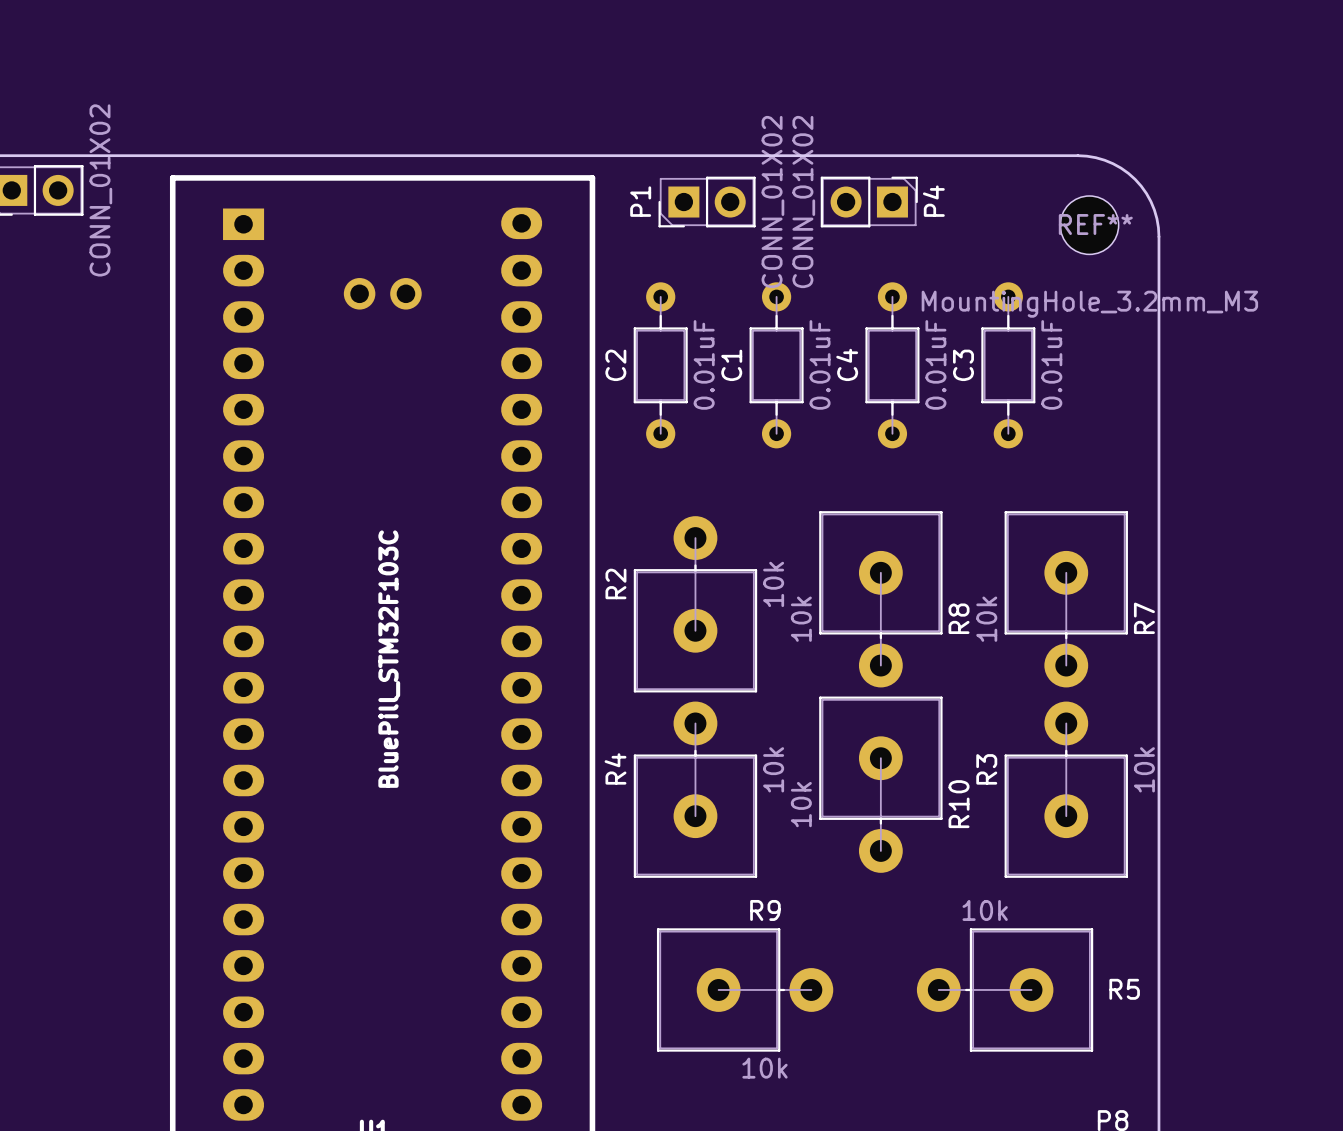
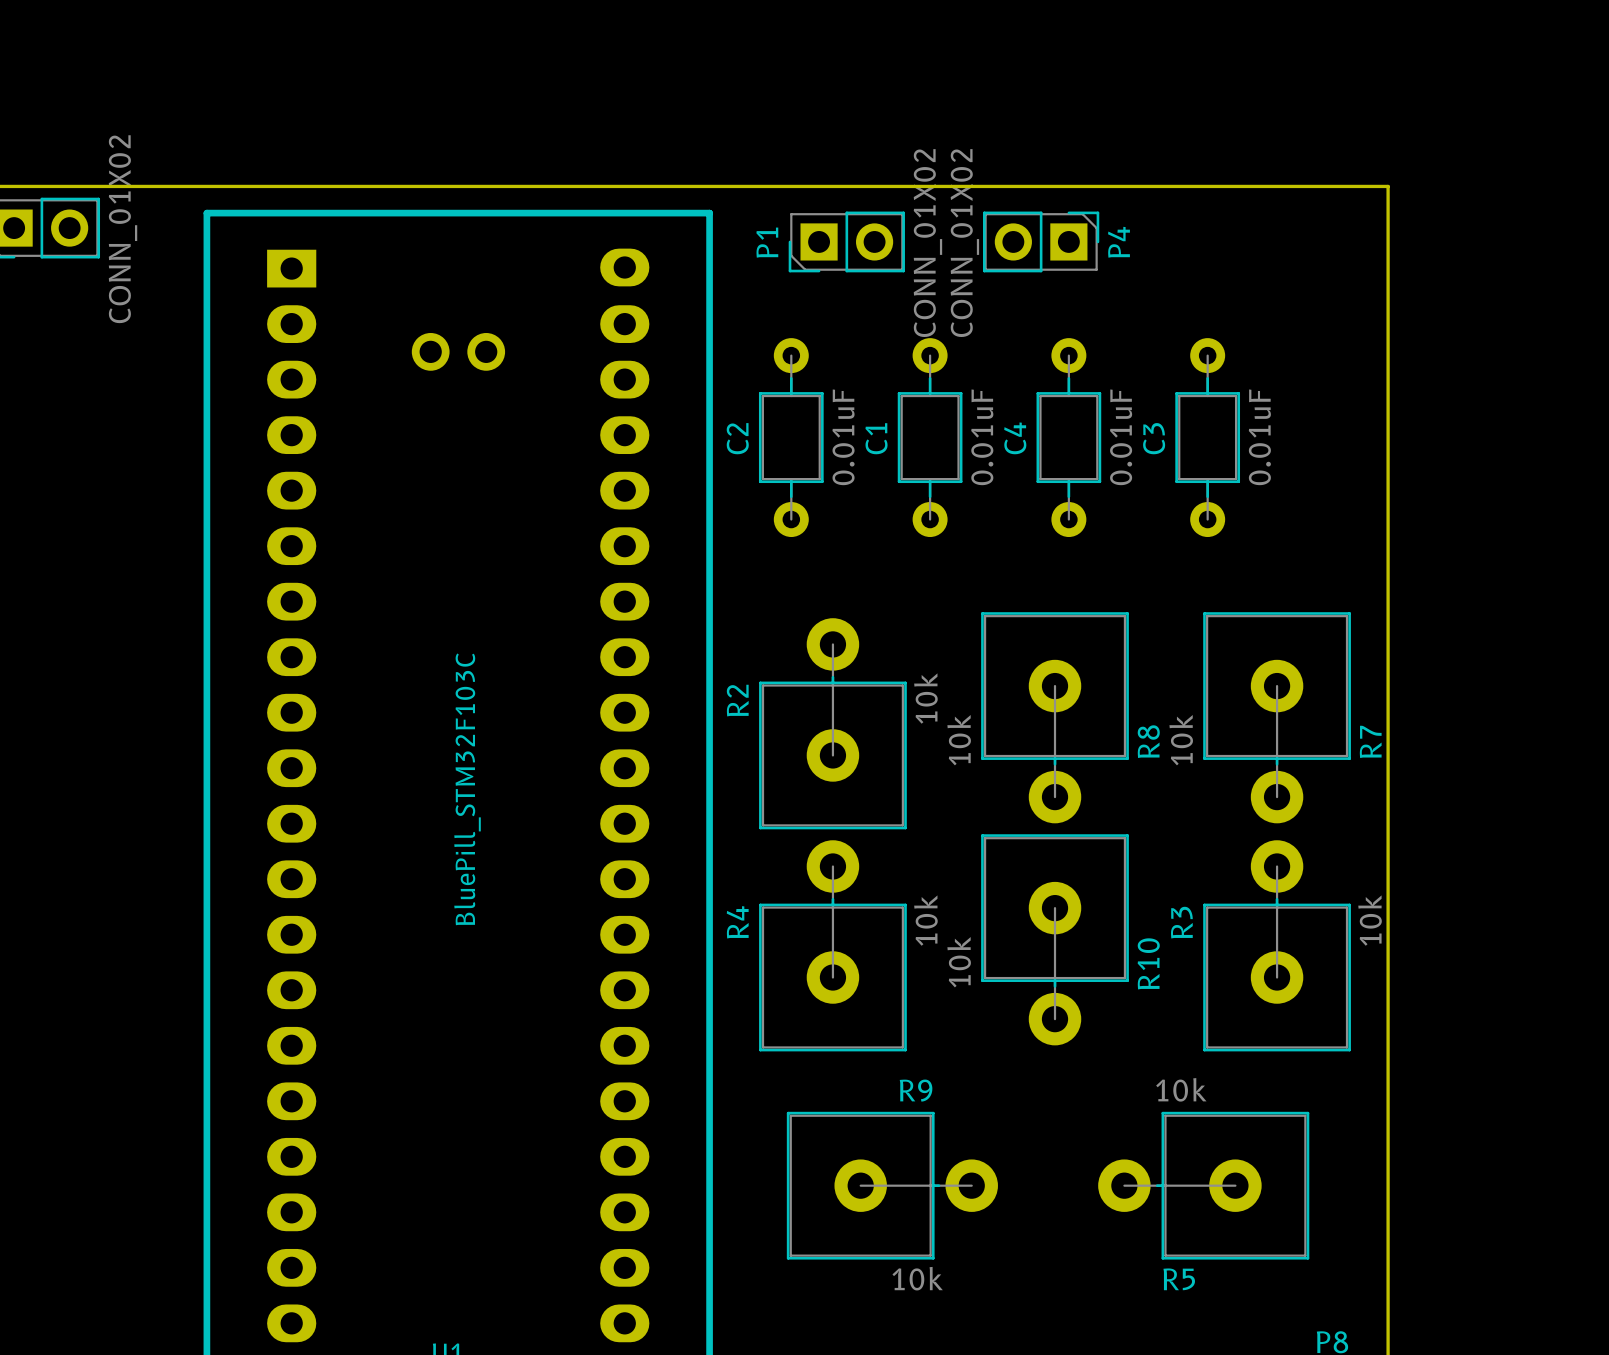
board edge: (1077, 155) (1104, 160) (1121, 168) (1135, 179) (1150, 201) (1156, 218) (1158, 236) -> (1290, 186) (1388, 186) (1388, 283)
REF**: MountingHole_3.2mm_M3 (1089, 225) -> none
R5 name position: R5 (1124, 989) -> R5 (1179, 1279)

